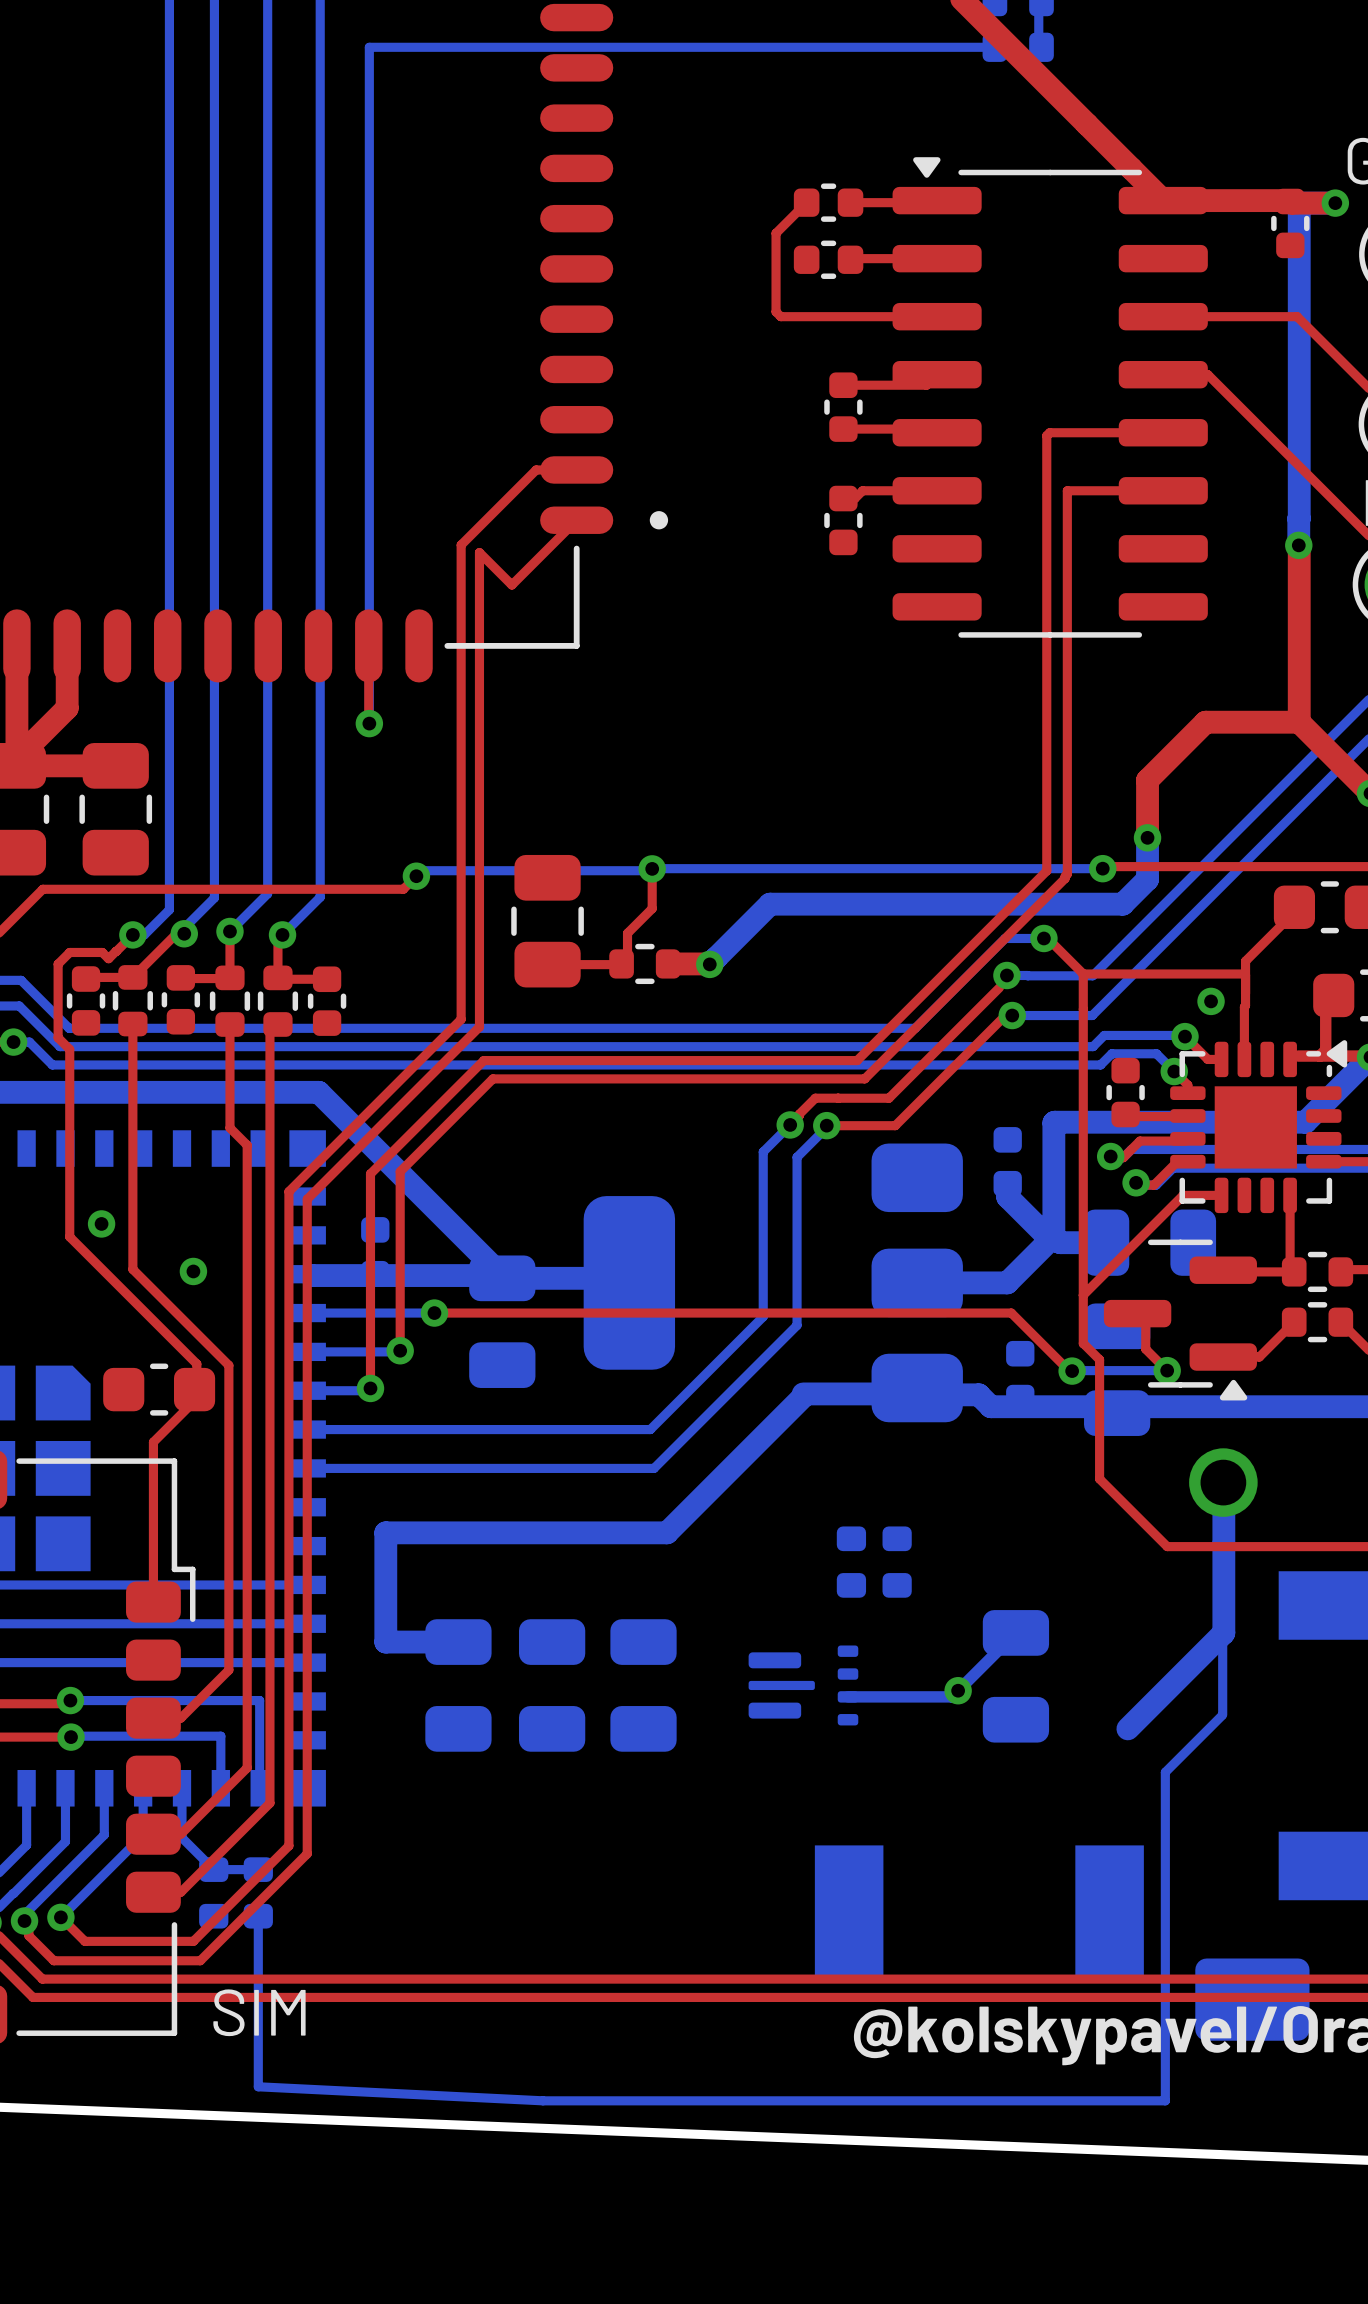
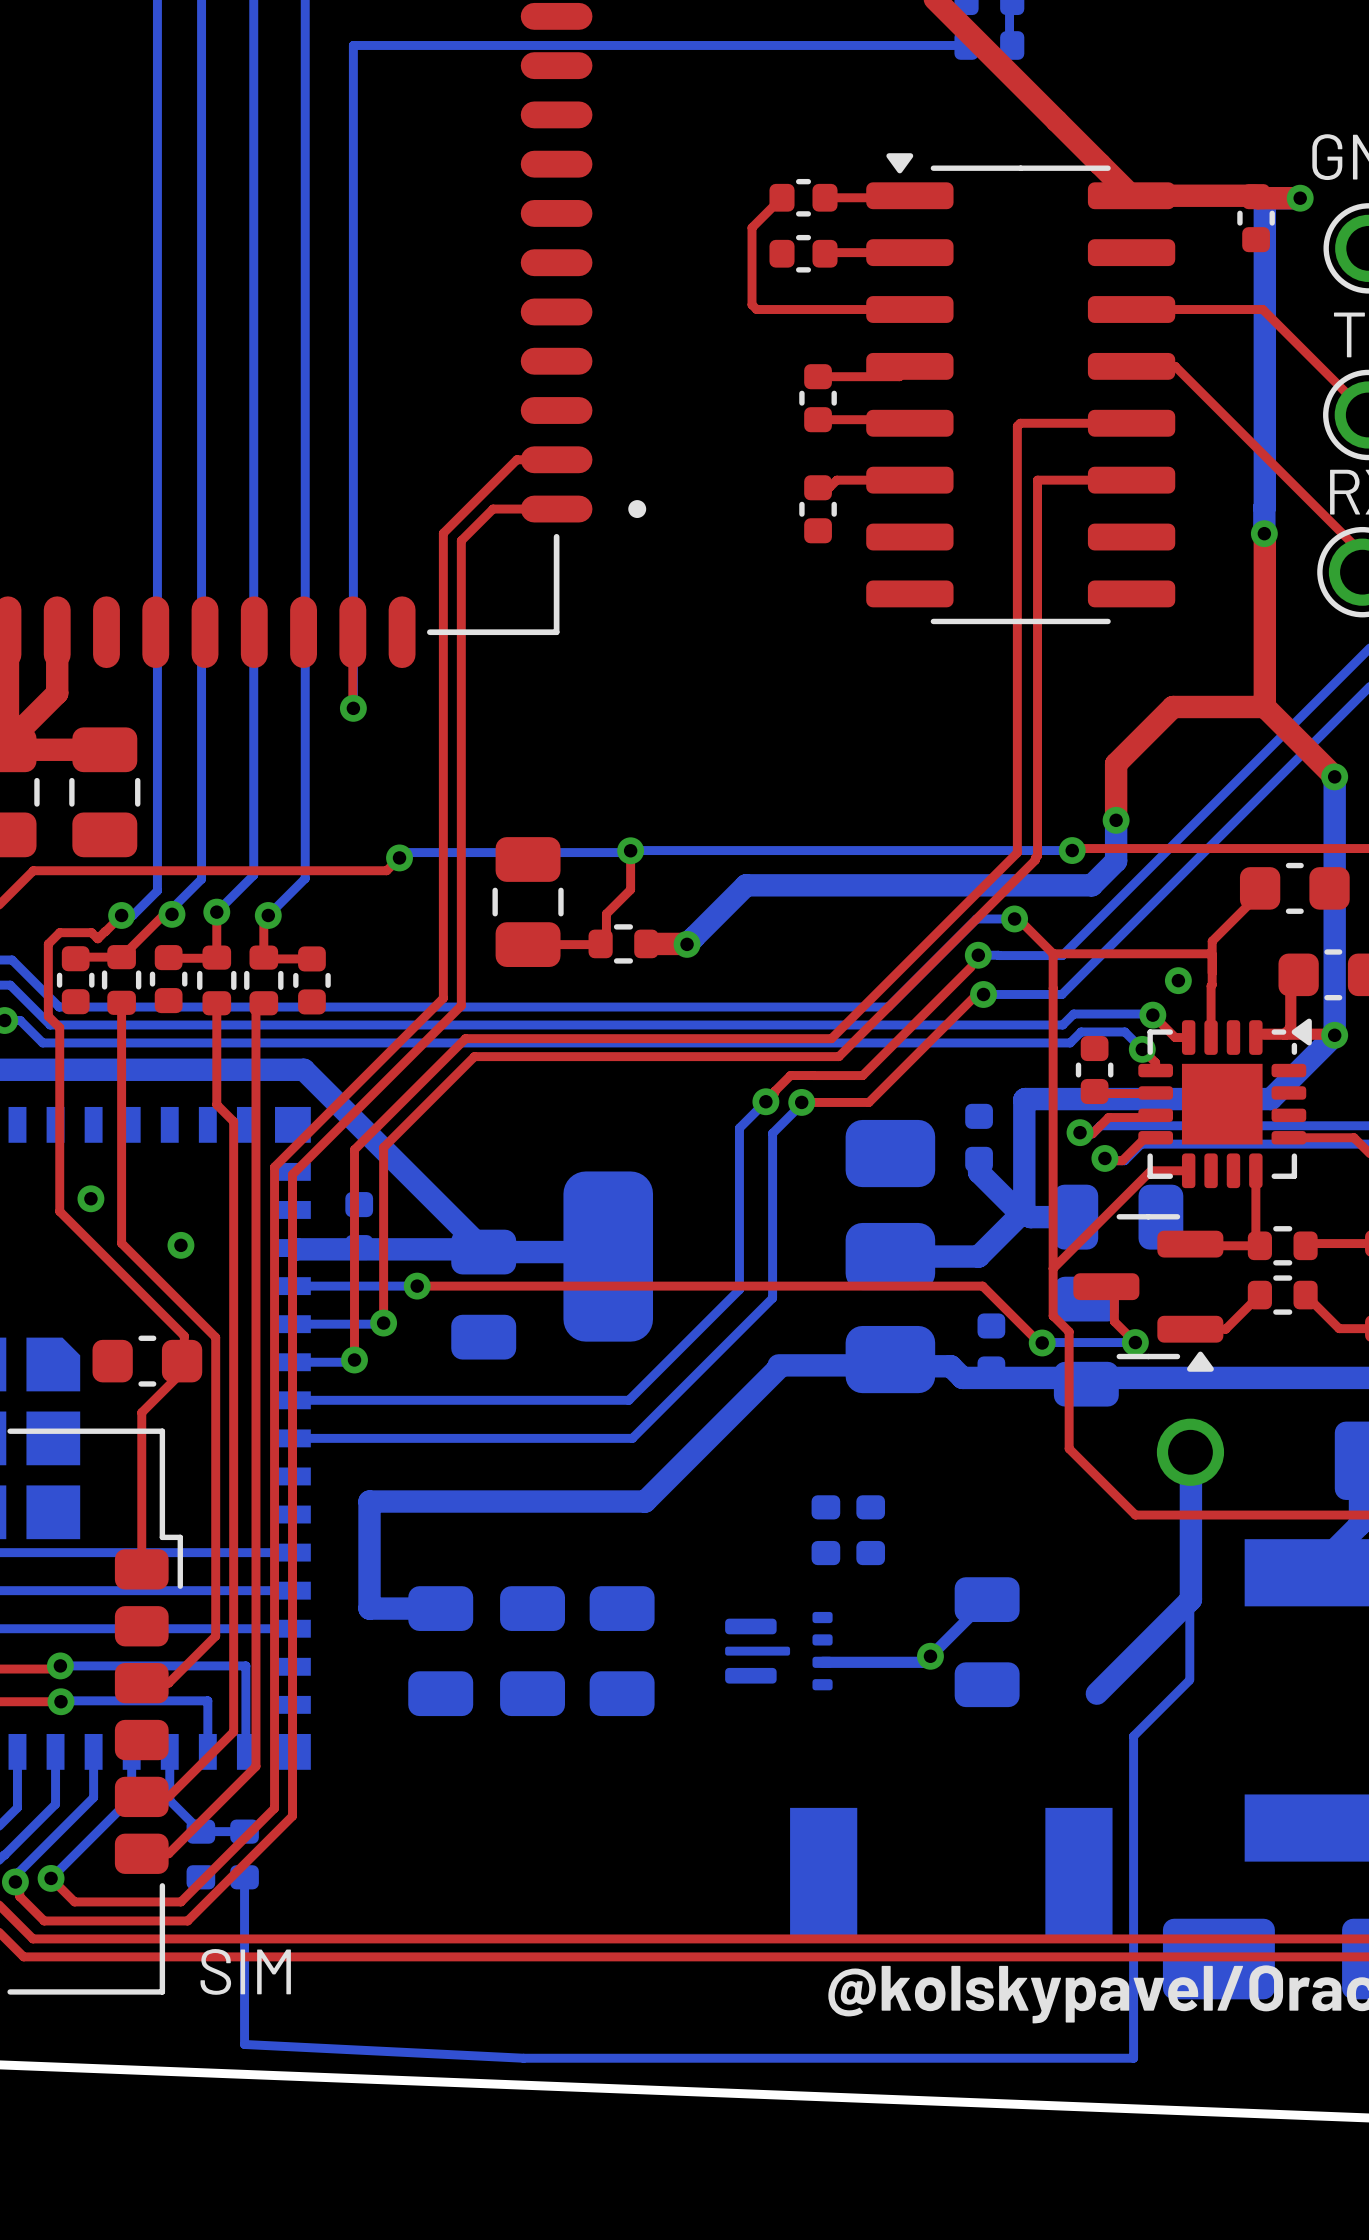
top track: (576, 520) (511, 585) (479, 552) -> (556, 509) (493, 509) (461, 540)

